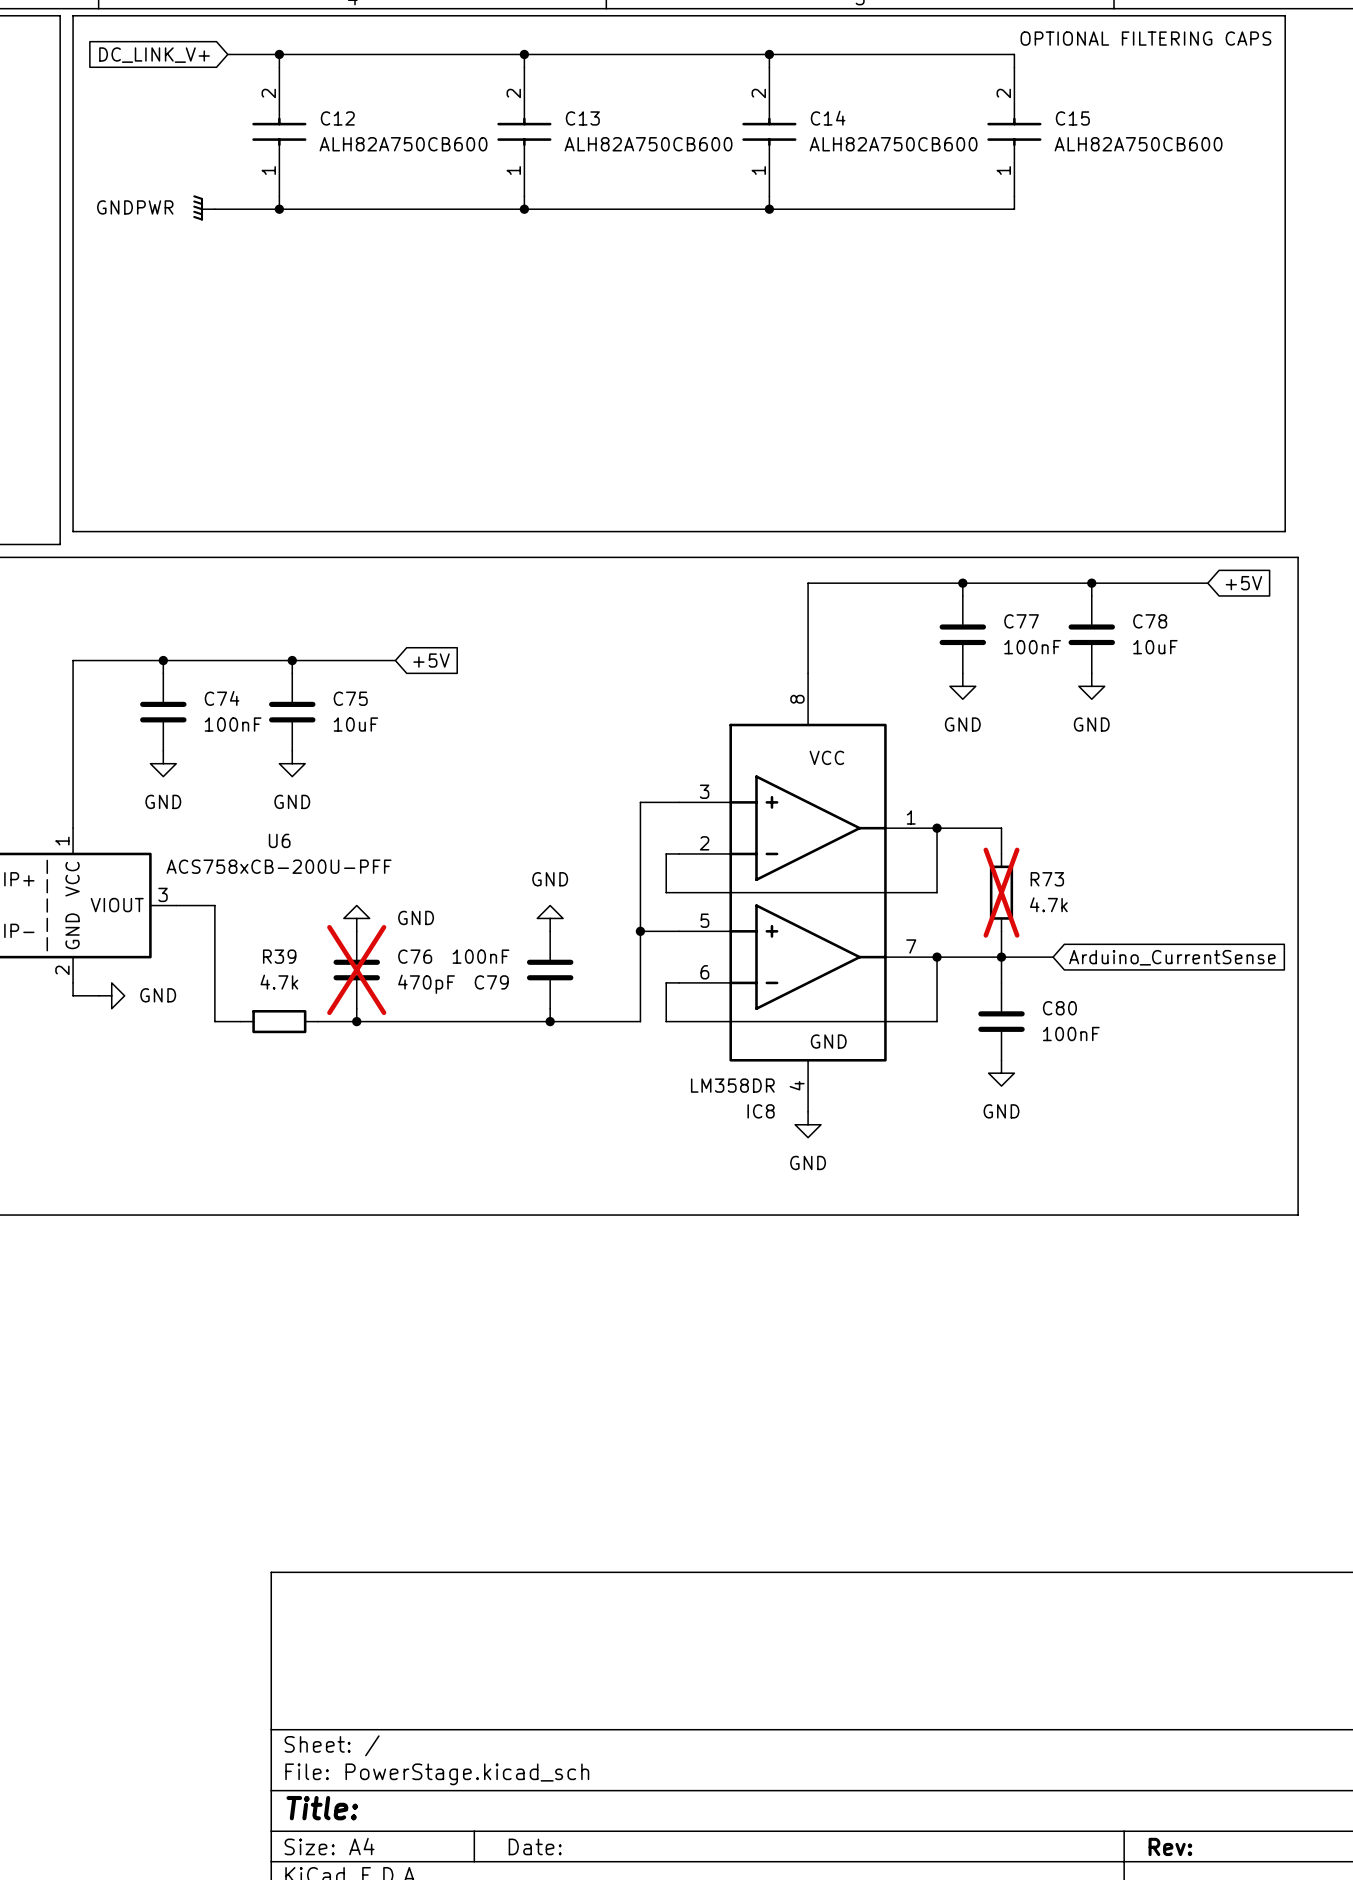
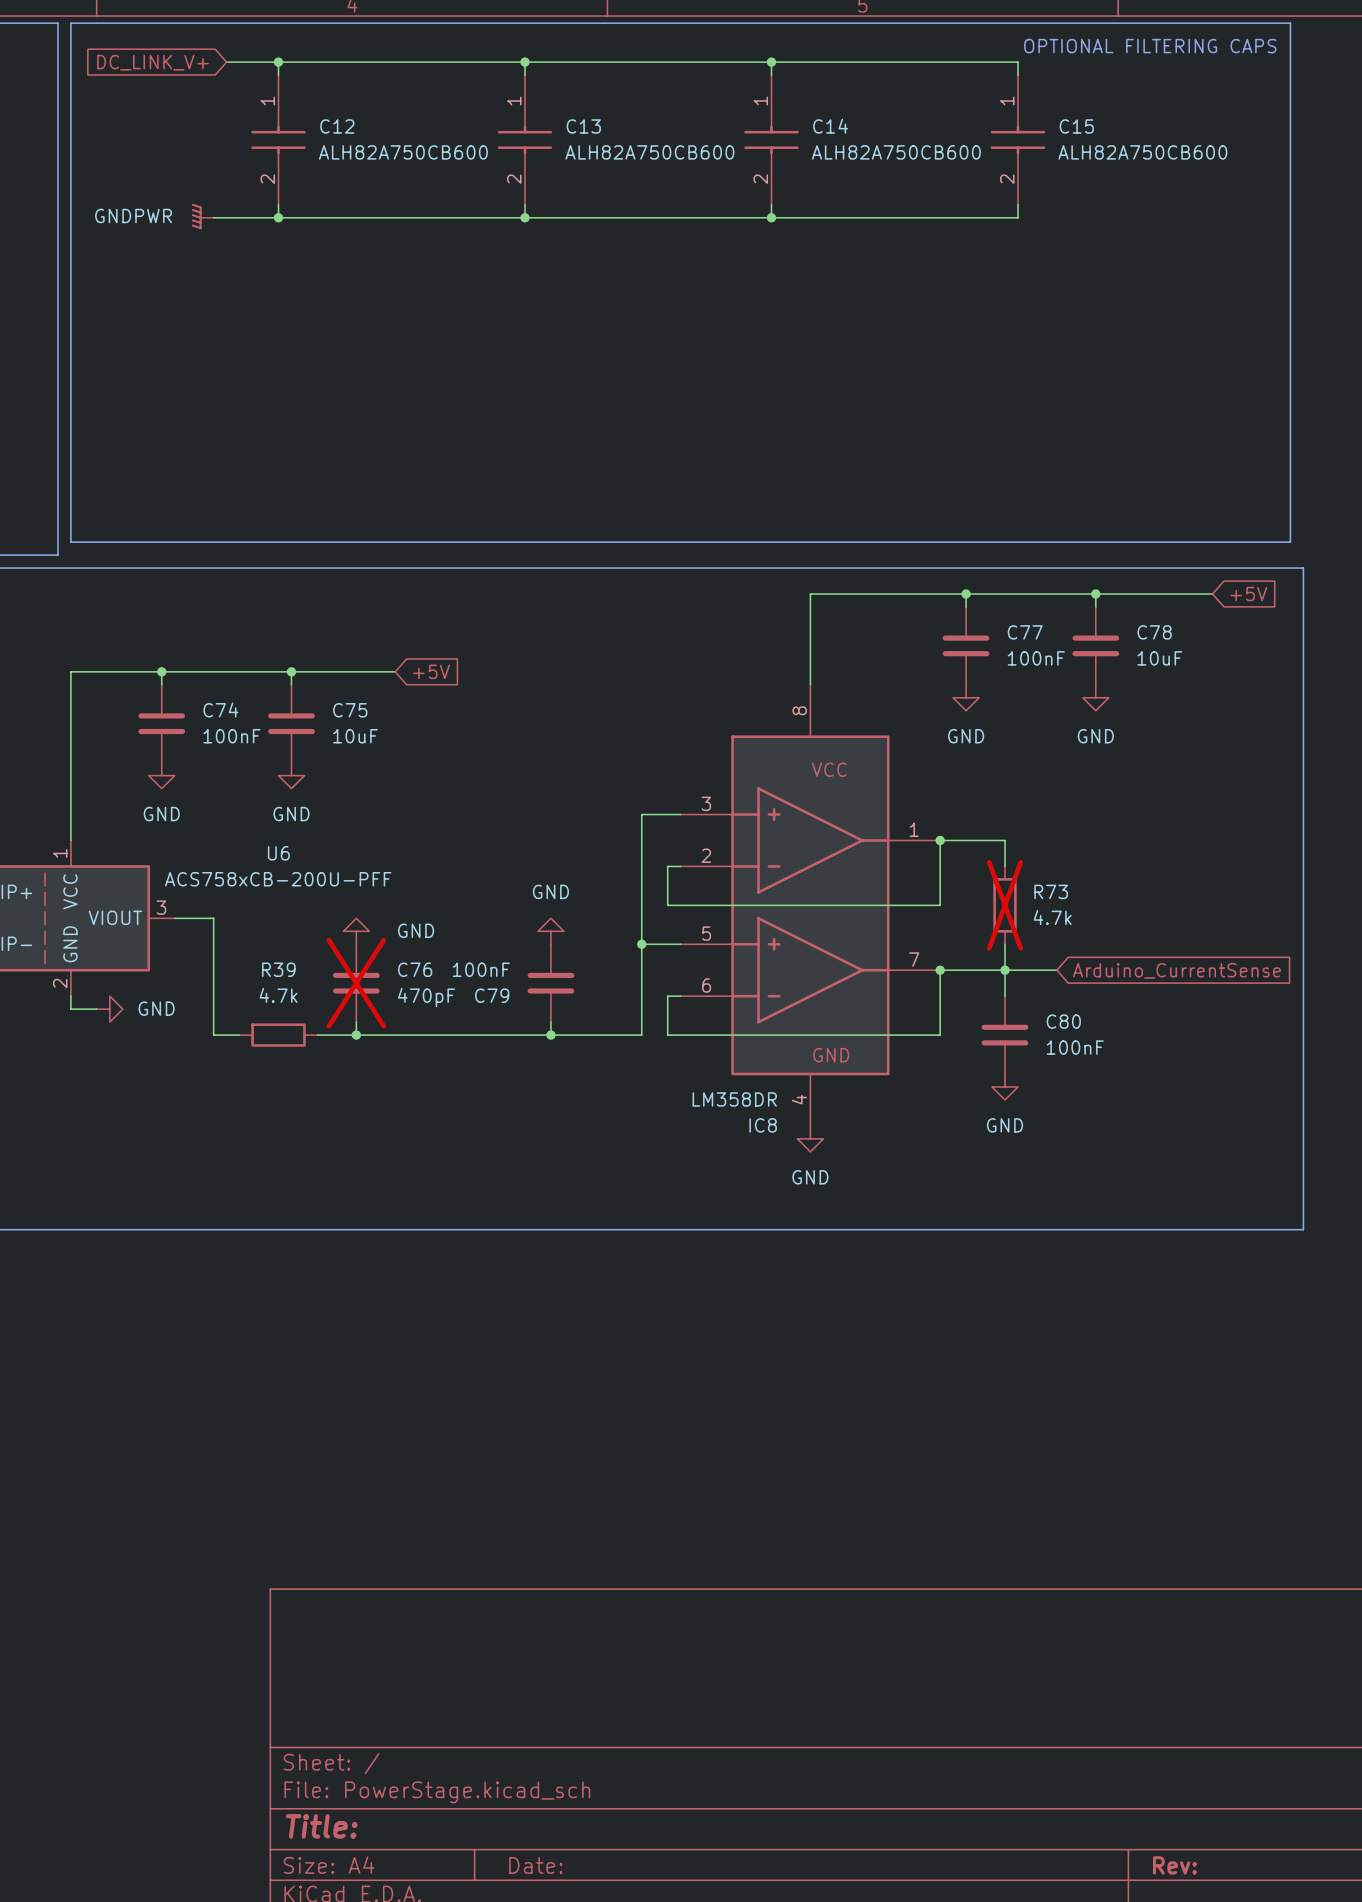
C12 rotation: 0° (279, 131) -> 180° (278, 139)
C13 rotation: 0° (524, 131) -> 180° (525, 139)
C14 rotation: 0° (769, 131) -> 180° (771, 139)
C15 rotation: 0° (1014, 131) -> 180° (1017, 139)

